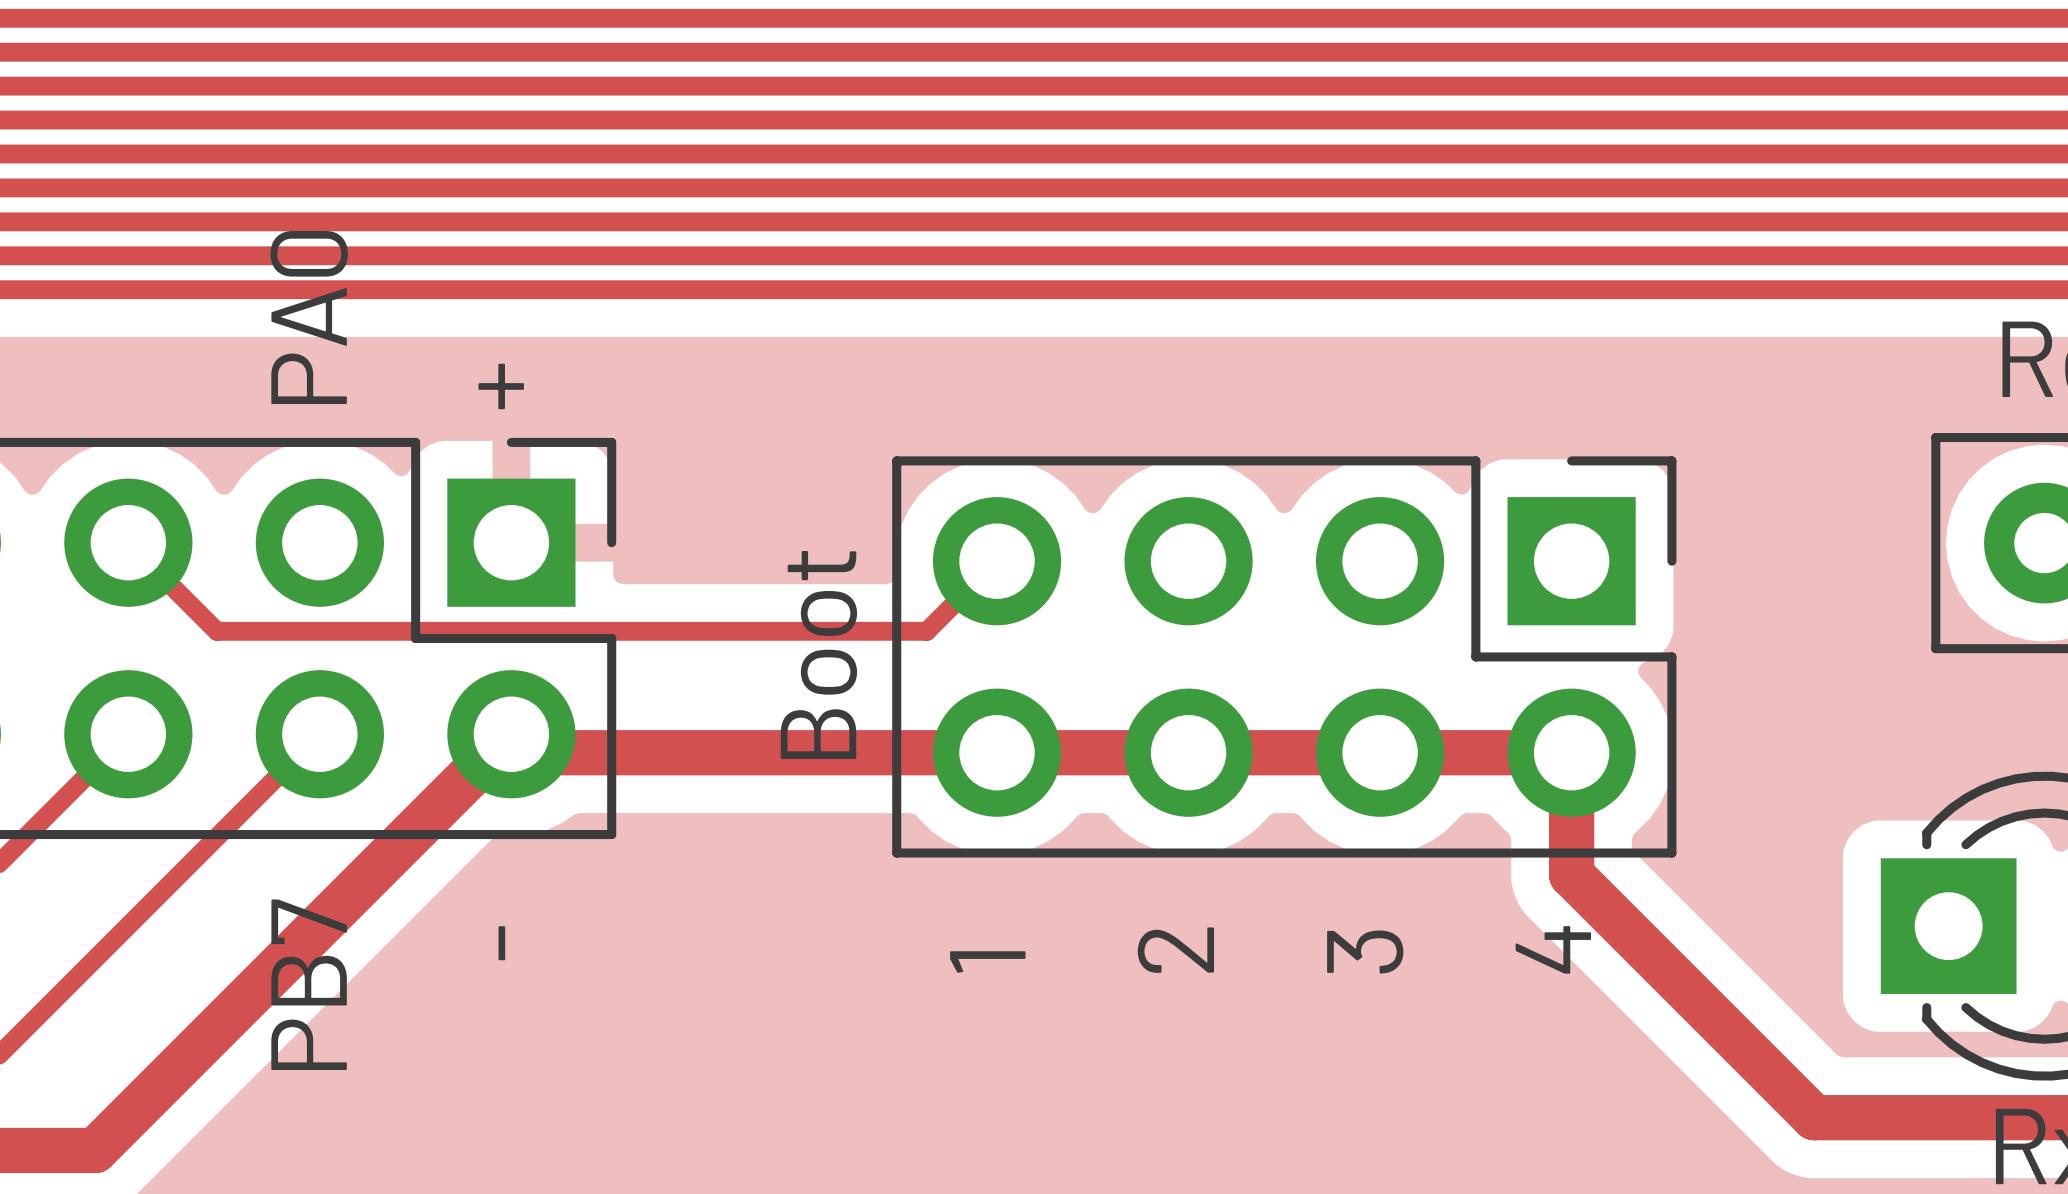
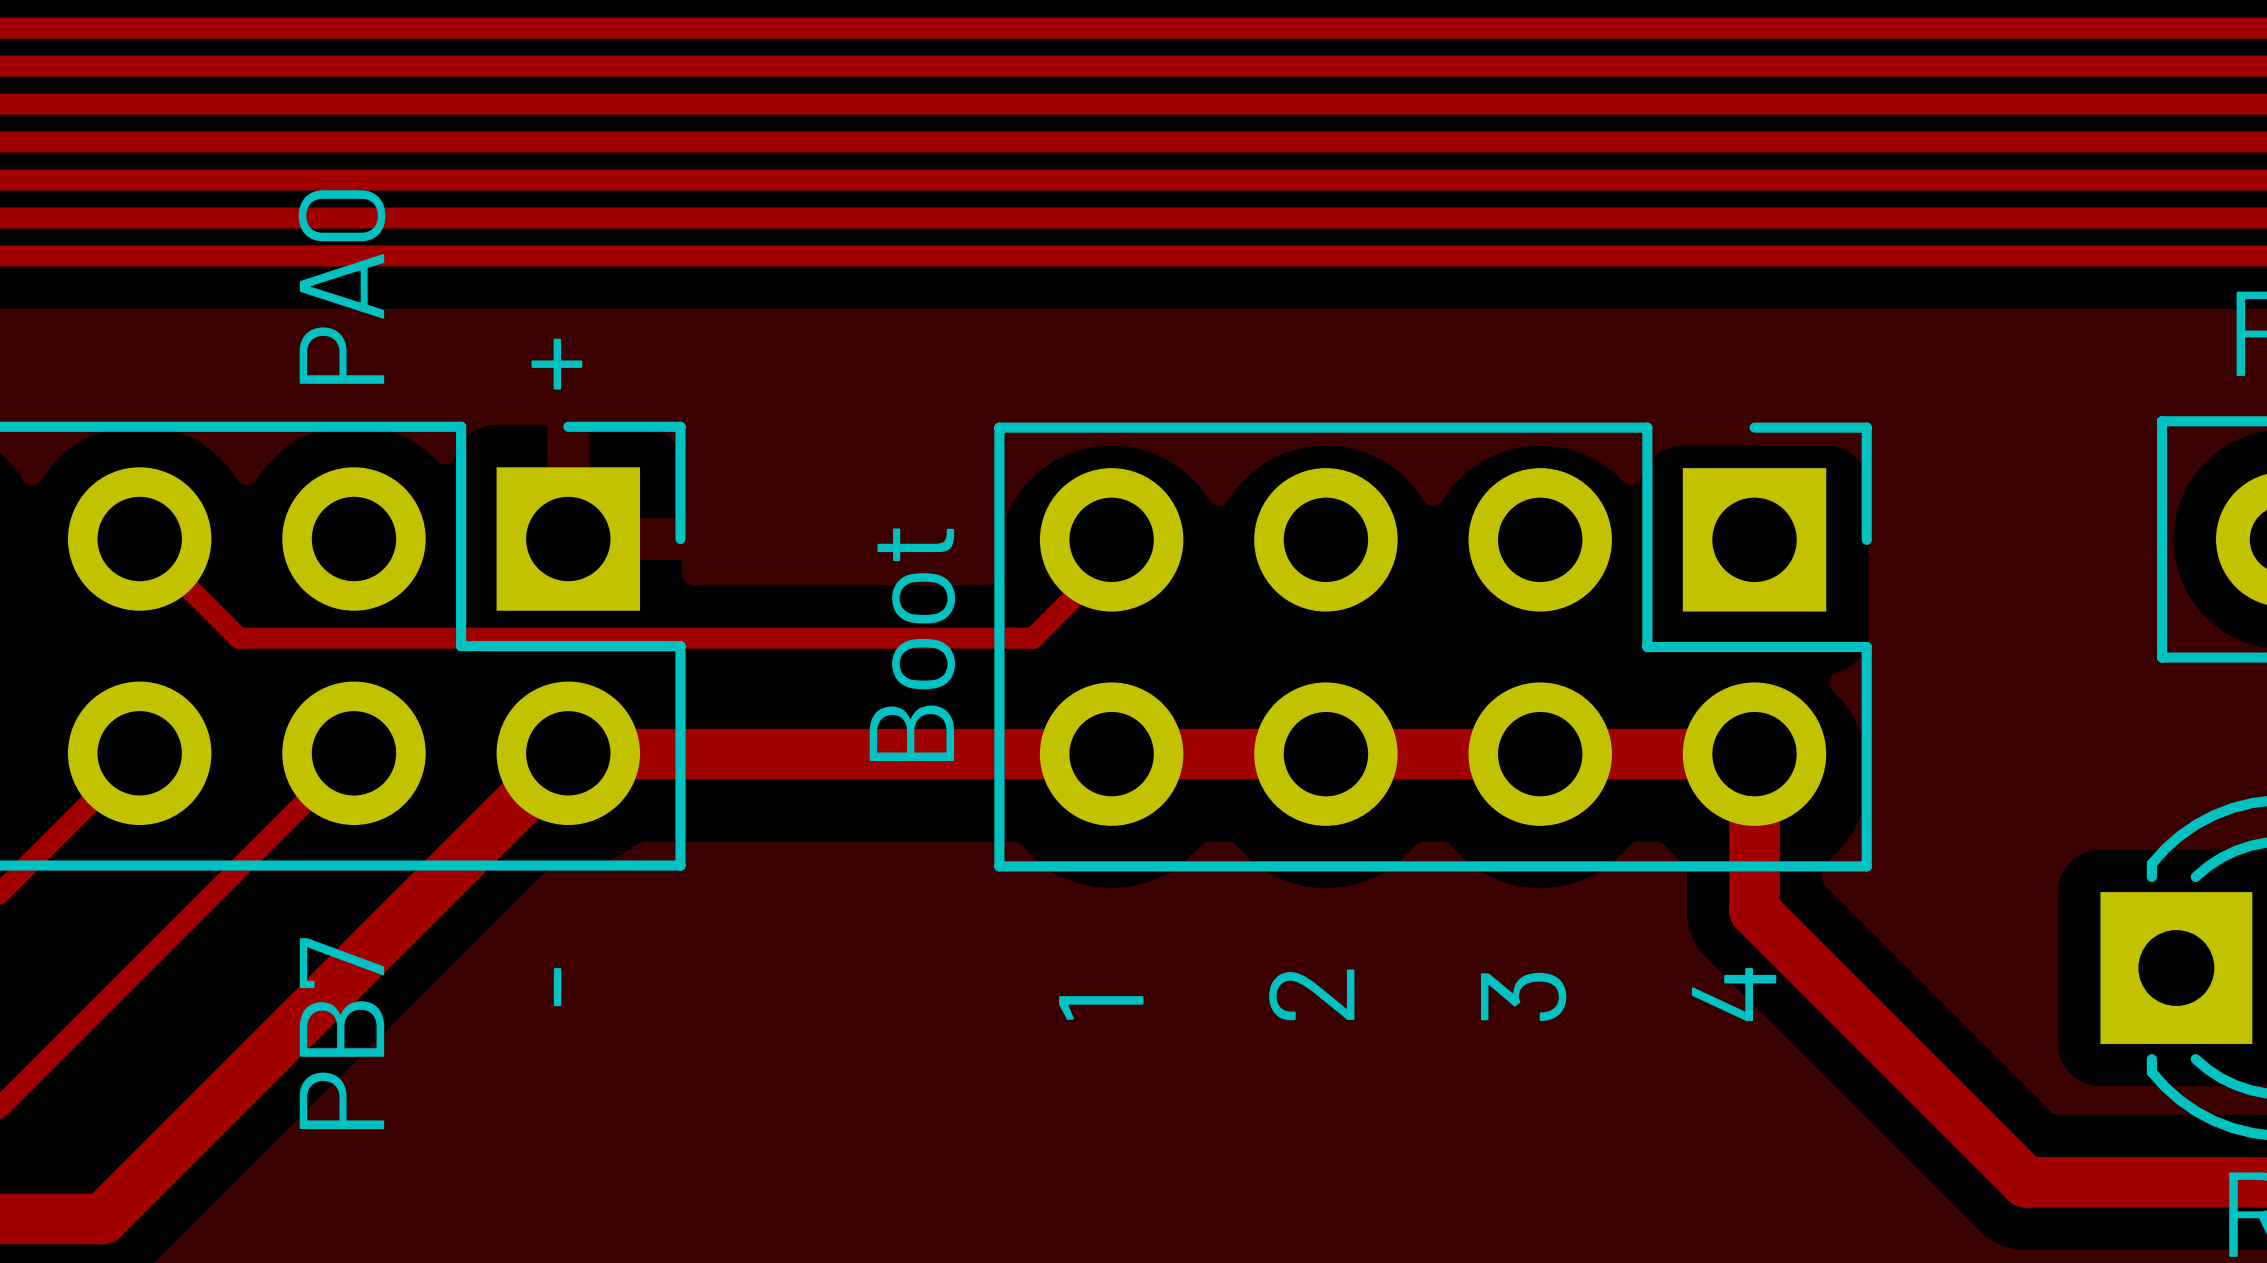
part position: (1284, 656) -> (1433, 646)
track: (512, 735) (529, 752) (1571, 752) -> (569, 754) (1754, 754) (1754, 773)

